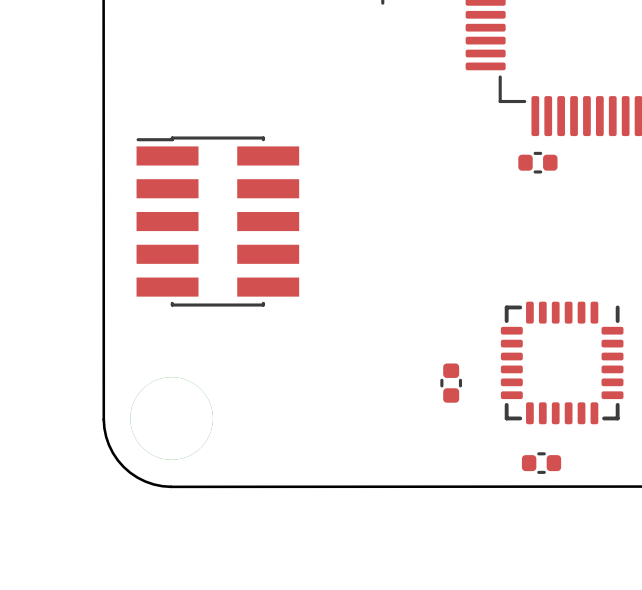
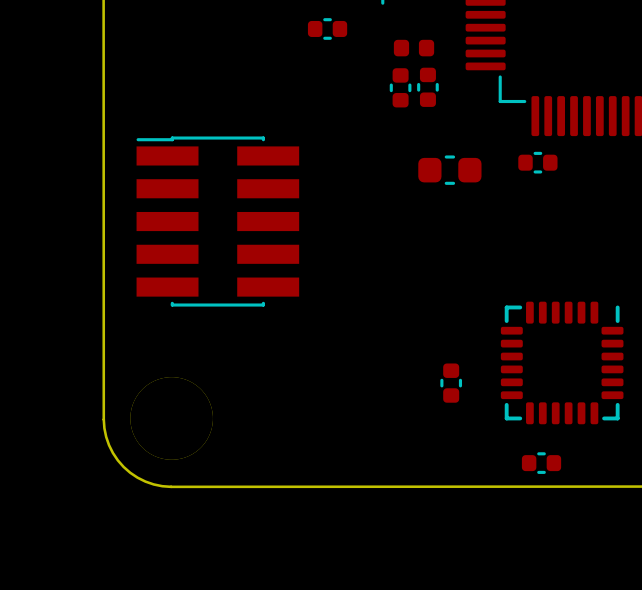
part: none -> (327, 28)
part: none -> (414, 48)
part: none -> (400, 87)
part: none -> (427, 87)
part: none -> (449, 170)

